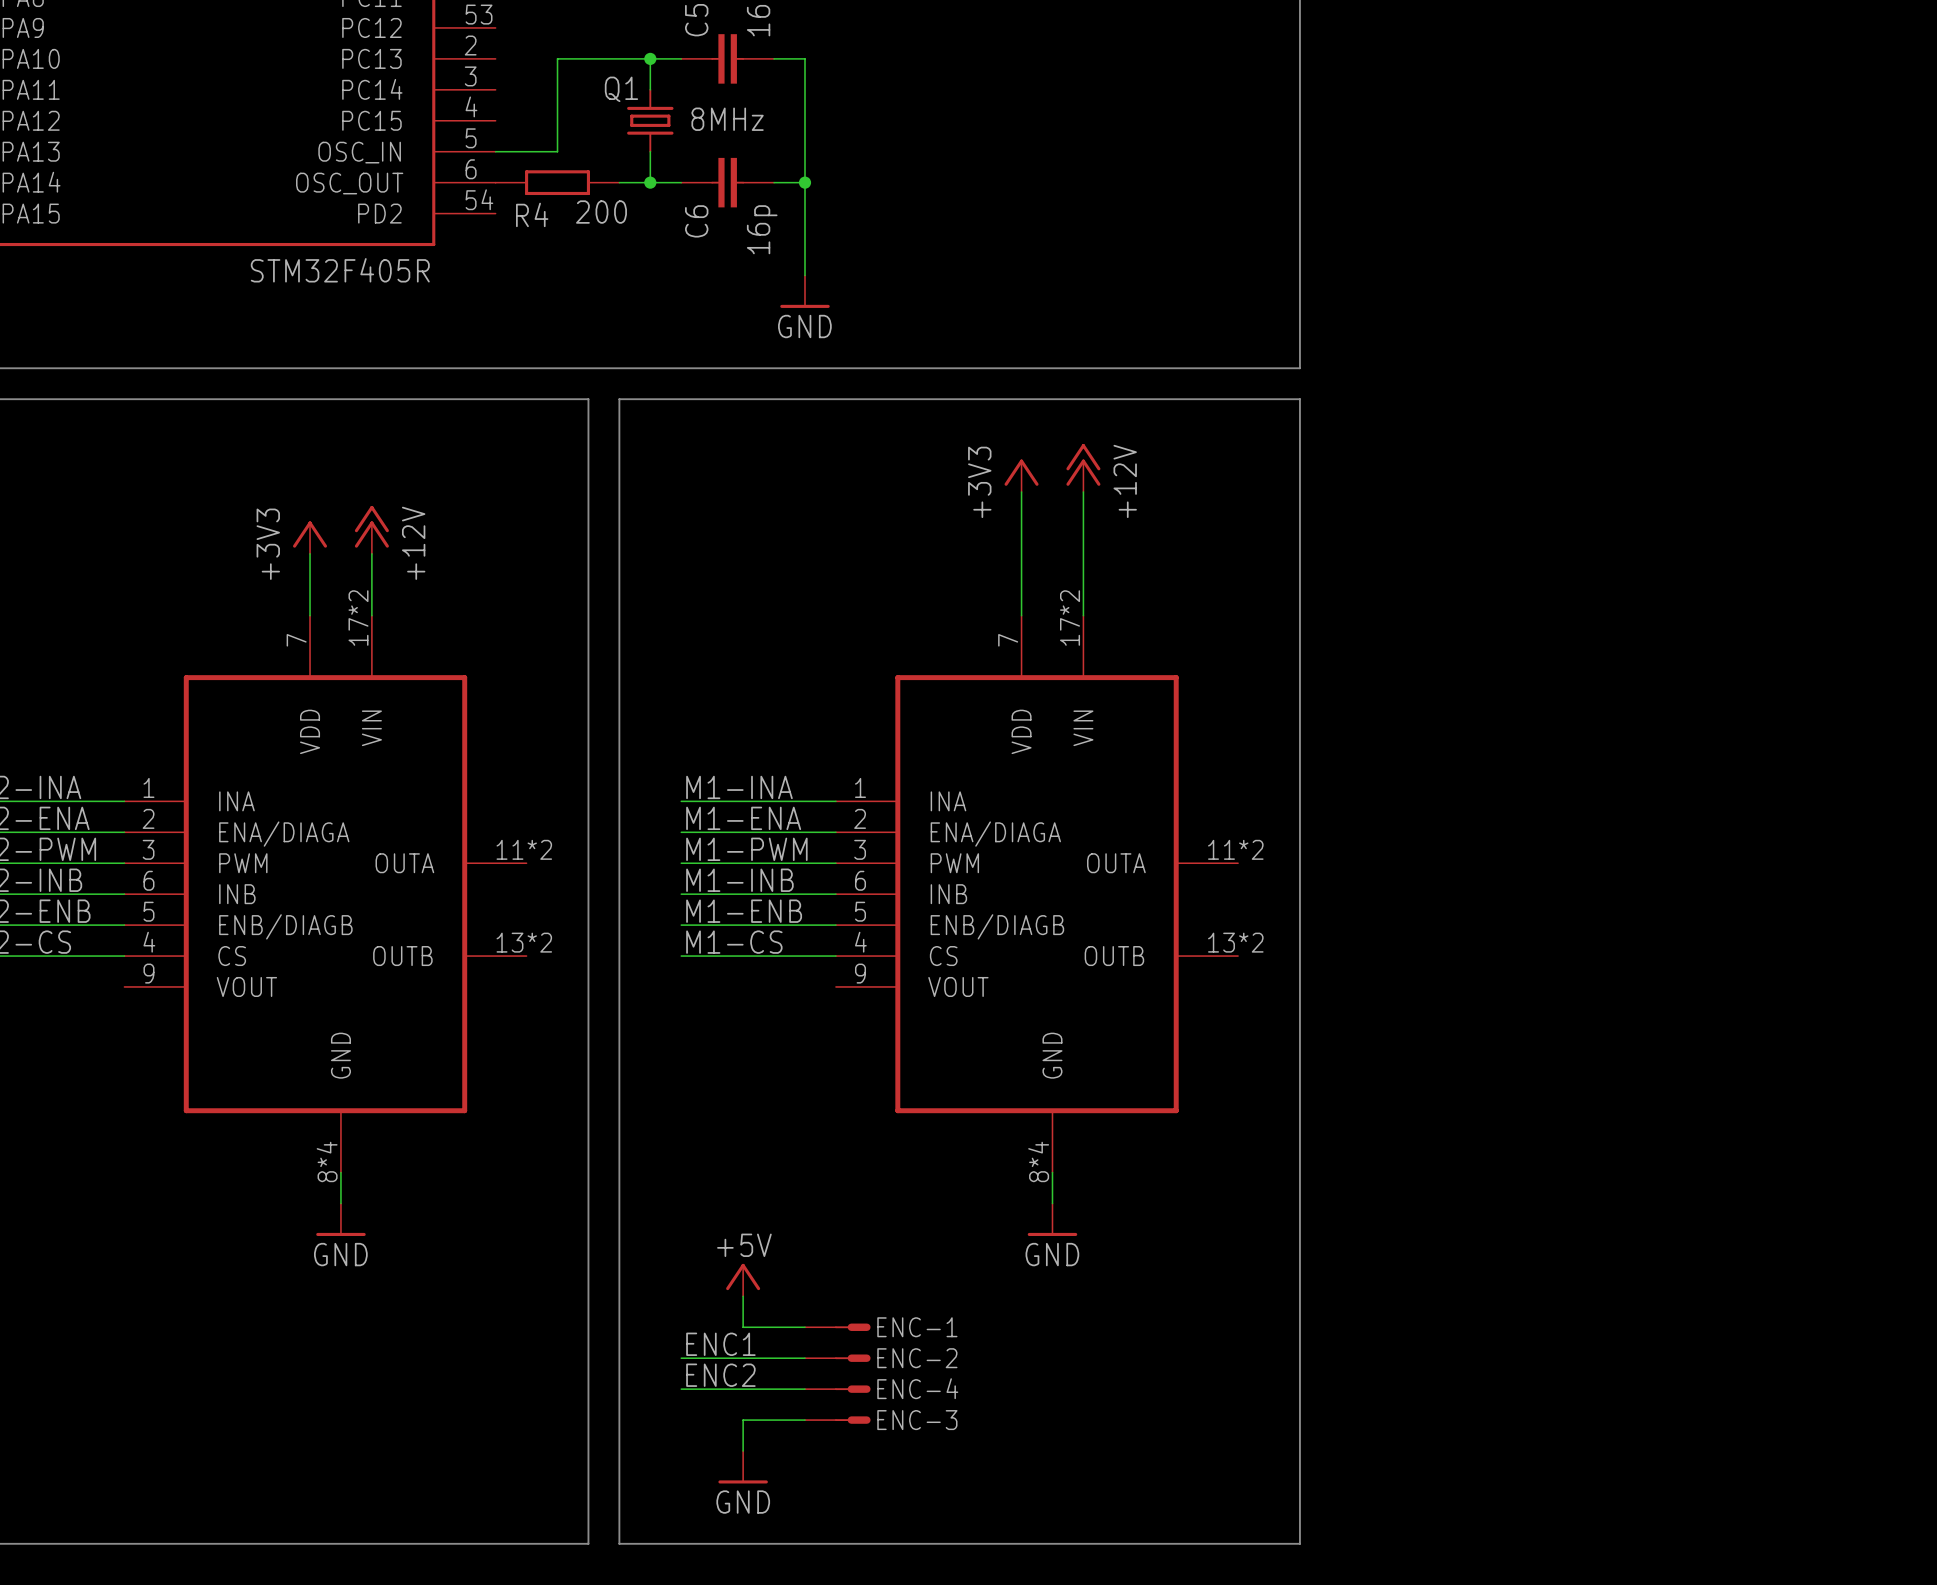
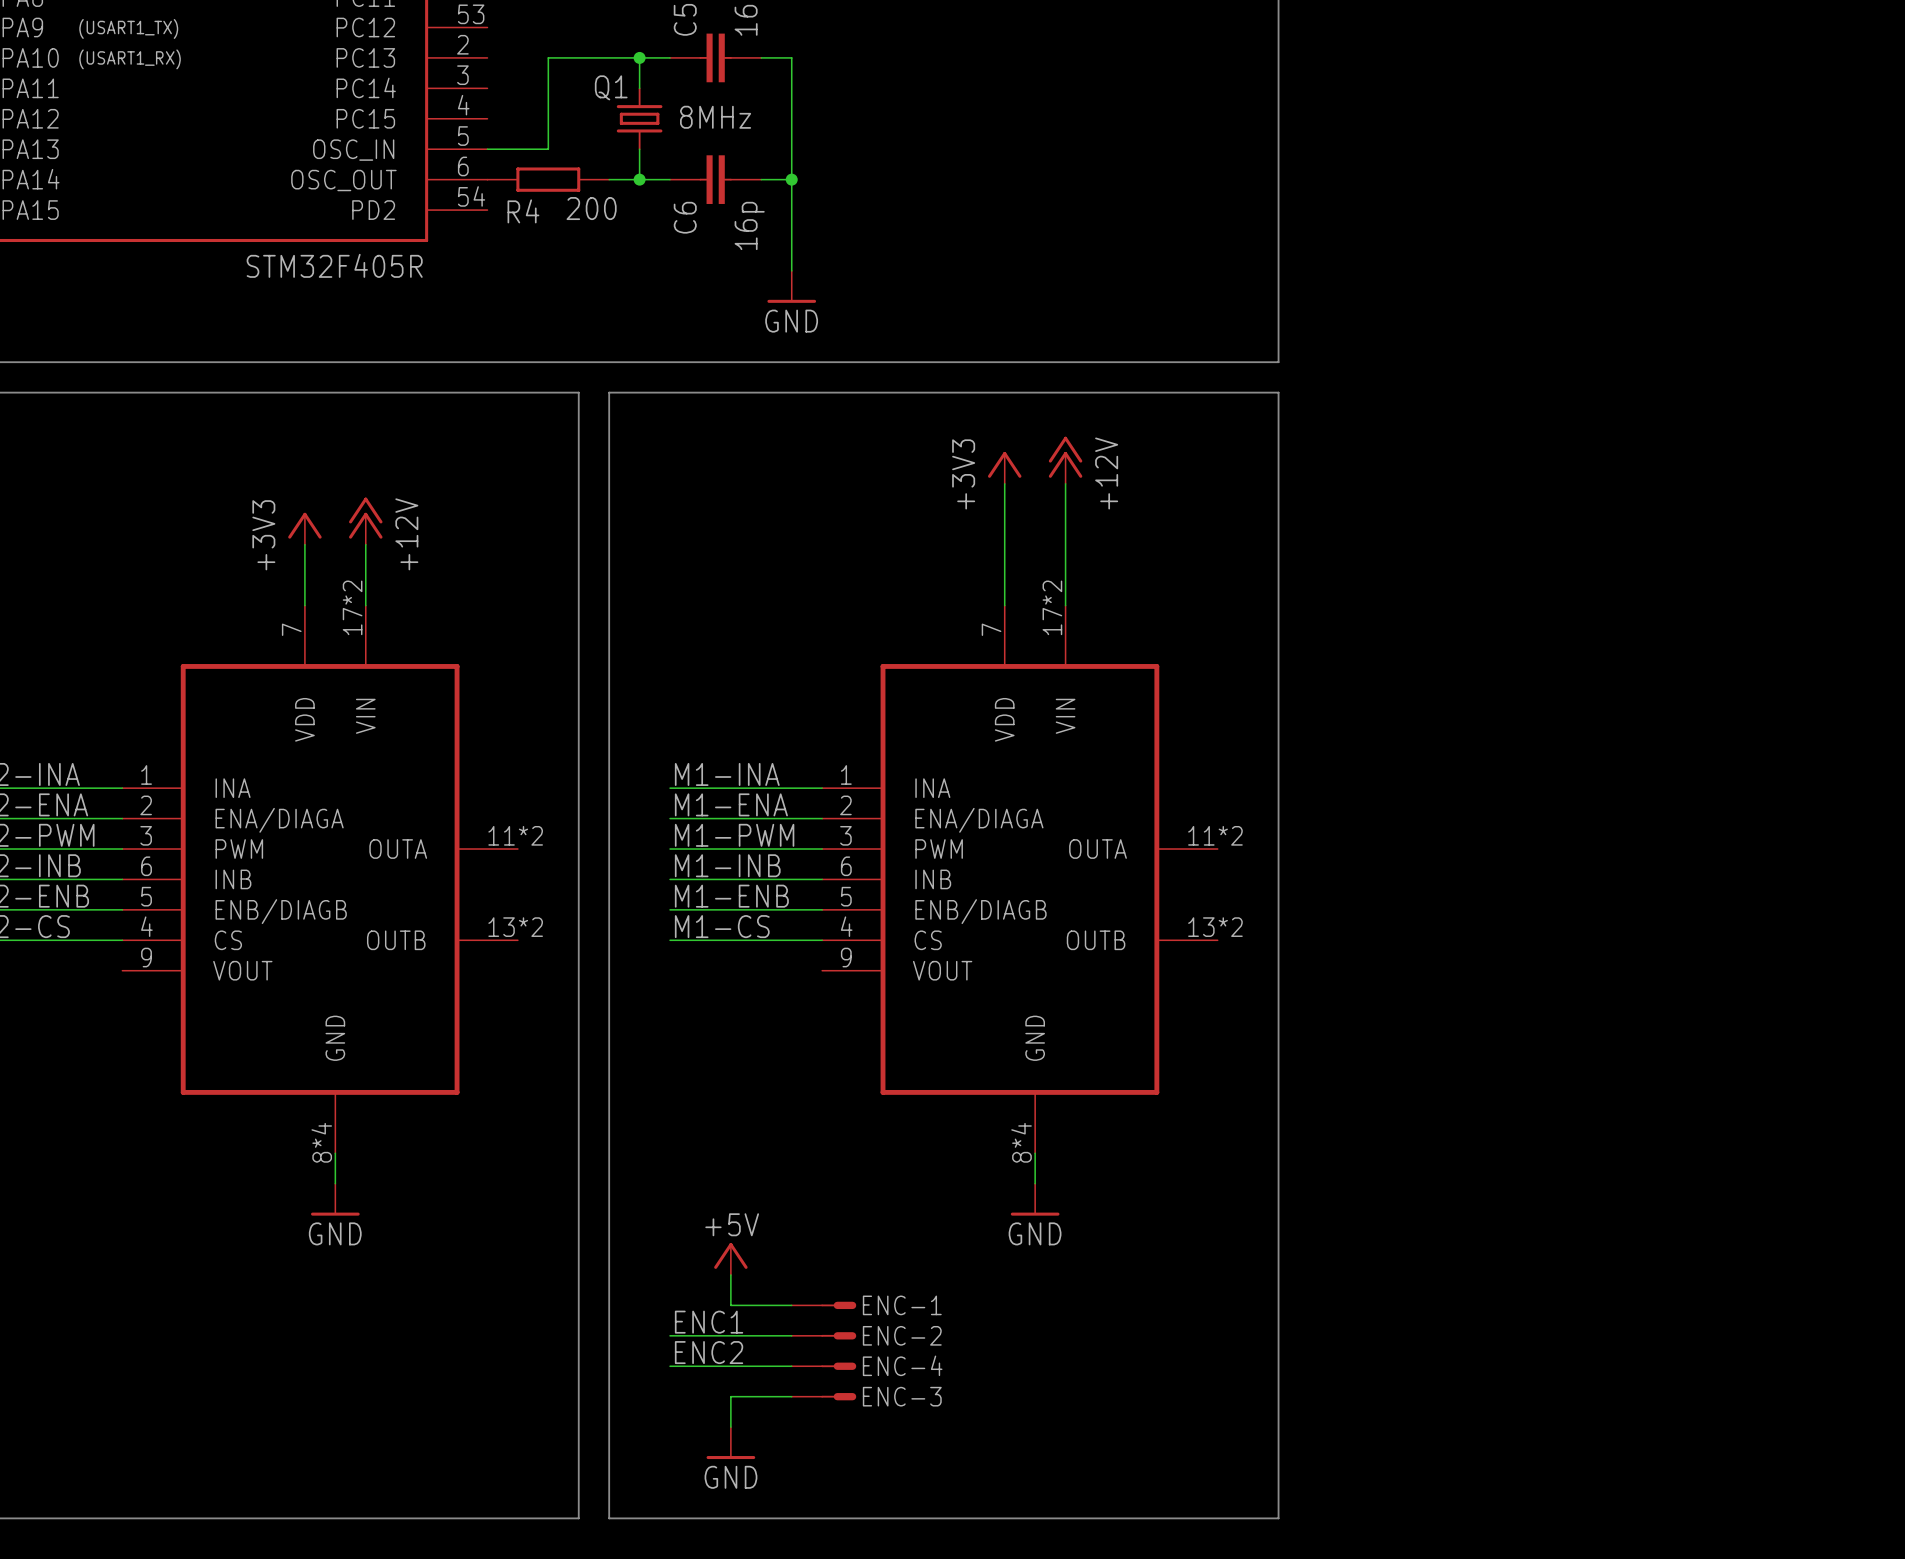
text: none -> (USART1_TX) (128, 28)
text: none -> (USART1_RX) (130, 59)

